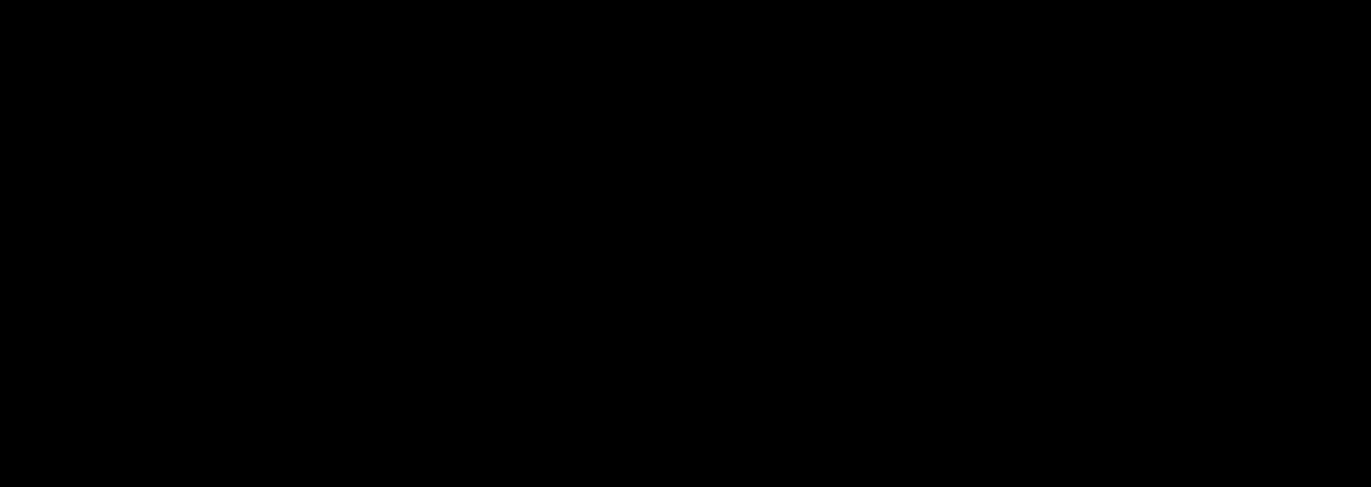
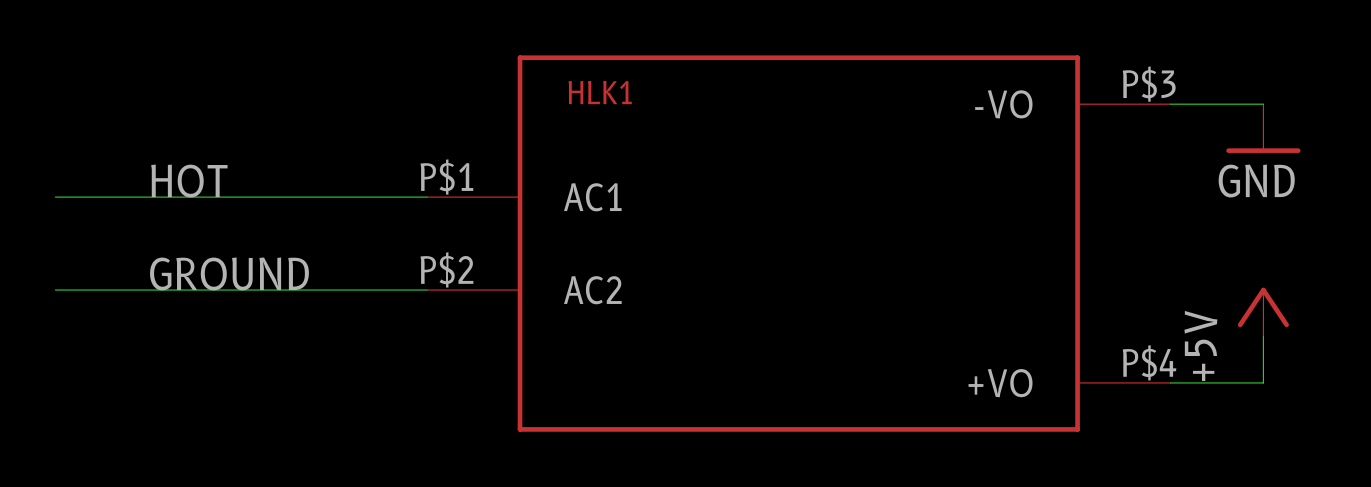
wire: none -> (1170, 104) (1263, 104)
power symbol: none -> GND (1263, 128)
label: none -> HOT (189, 181)
wire: none -> (55, 197) (427, 197)
HLK1: none -> (798, 243)
label: none -> GROUND (229, 273)
wire: none -> (55, 290) (427, 290)
power symbol: none -> +5V (1263, 312)
wire: none -> (1263, 336) (1263, 382) (1170, 382)

